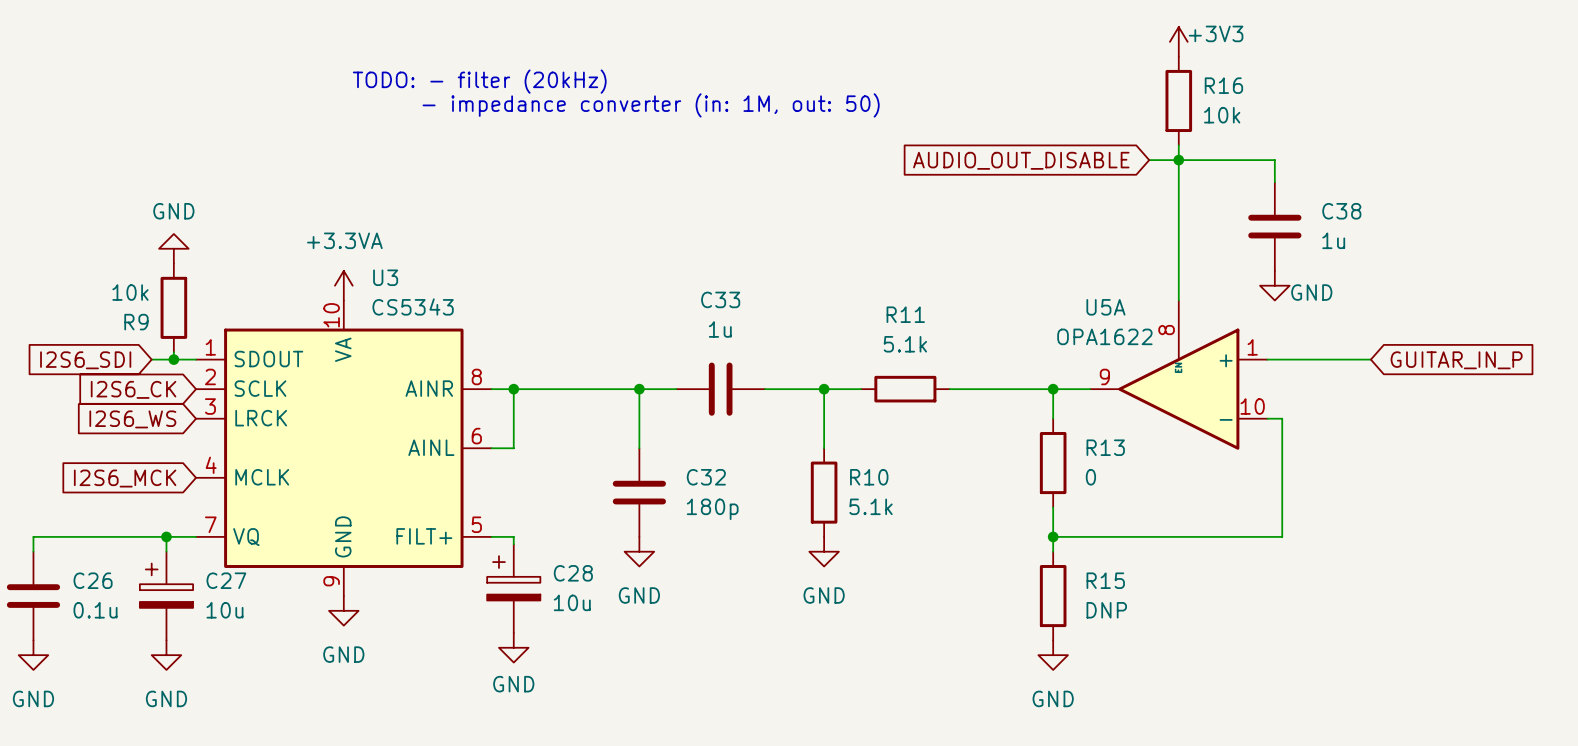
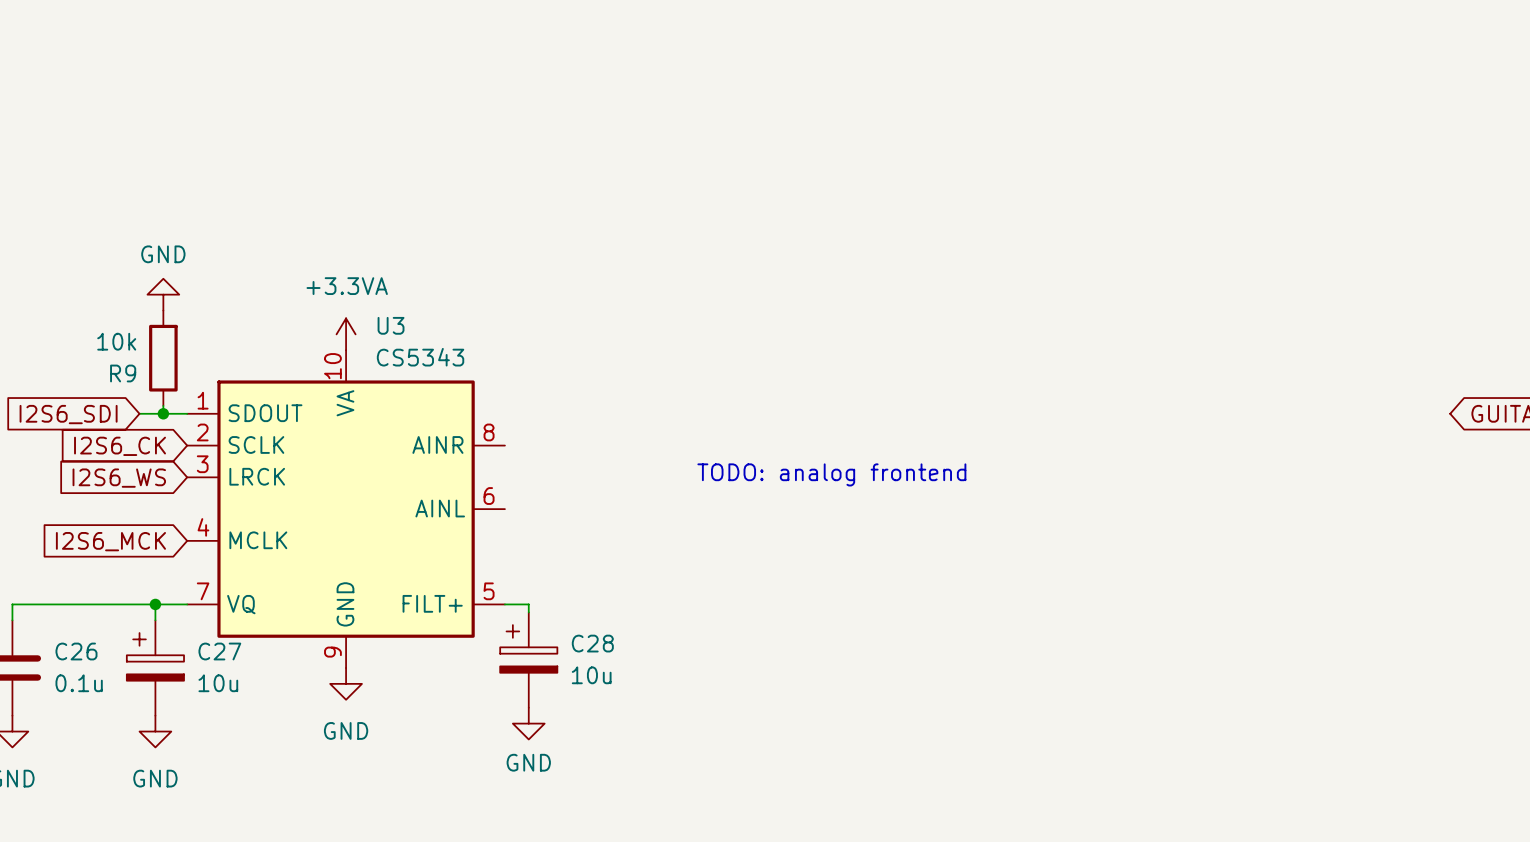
power symbol: +3V3 (1178, 41) -> none
text: TODO: - filter (20kHz) (479, 81) -> none
R16: 10k (1178, 100) -> none
text: - impedance converter (in: 1M, out: 50) (651, 105) -> none
wire: (1178, 145) (1178, 300) -> none
global label: AUDIO_OUT_DISABLE (1021, 160) -> none
wire: (1149, 160) (1274, 160) (1274, 182) -> none
junction: (1178, 160) -> none
C38: 1u (1274, 226) -> none
power symbol: GND (1274, 285) -> none
wire: (1267, 359) (1370, 359) -> none
U5A: OPA1622 (1178, 375) -> none
wire: (491, 389) (676, 389) -> none
wire: (513, 389) (513, 448) (491, 448) -> none
junction: (513, 389) -> none
wire: (639, 389) (639, 448) -> none
junction: (639, 389) -> none
C33: 1u (720, 389) -> none
wire: (764, 389) (861, 389) -> none
wire: (824, 389) (824, 448) -> none
junction: (824, 389) -> none
R11: 5.1k (905, 389) -> none
wire: (949, 389) (1090, 389) -> none
wire: (1053, 389) (1053, 418) -> none
junction: (1053, 389) -> none
text: none -> TODO: analog frontend (831, 474)
wire: (1267, 418) (1282, 418) (1282, 536) (1053, 536) -> none
R13: 0 (1053, 463) -> none
C32: 180p (639, 492) -> none
R10: 5.1k (824, 492) -> none
wire: (1053, 507) (1053, 551) -> none
junction: (1053, 536) -> none
power symbol: GND (639, 551) -> none
power symbol: GND (824, 551) -> none
R15: DNP (1053, 596) -> none
power symbol: GND (1053, 655) -> none

